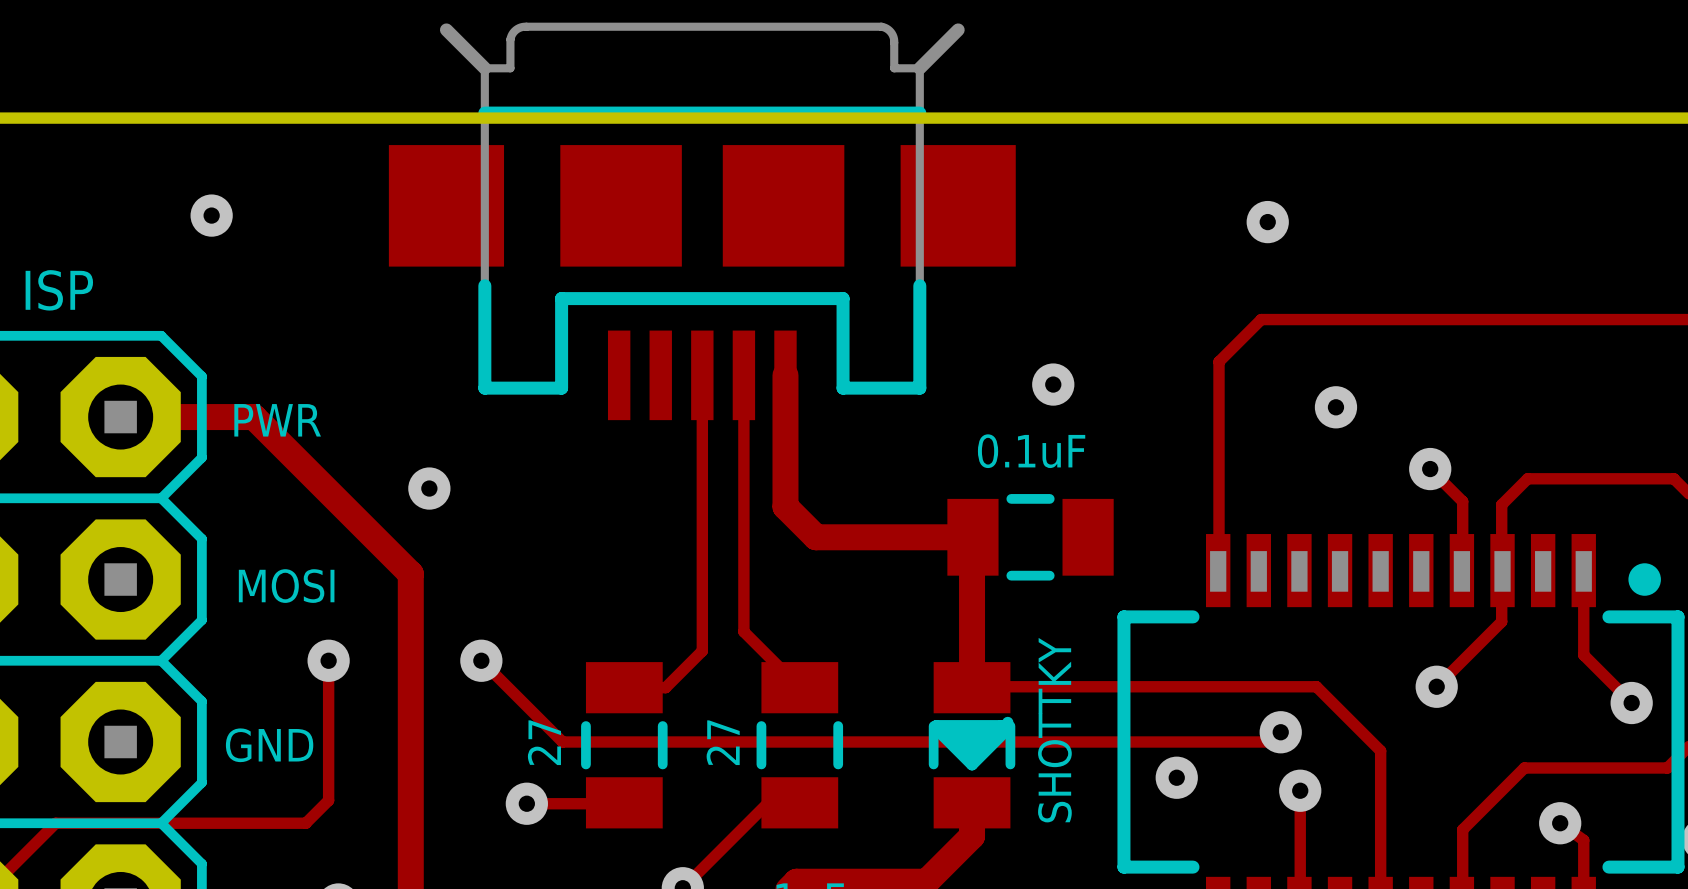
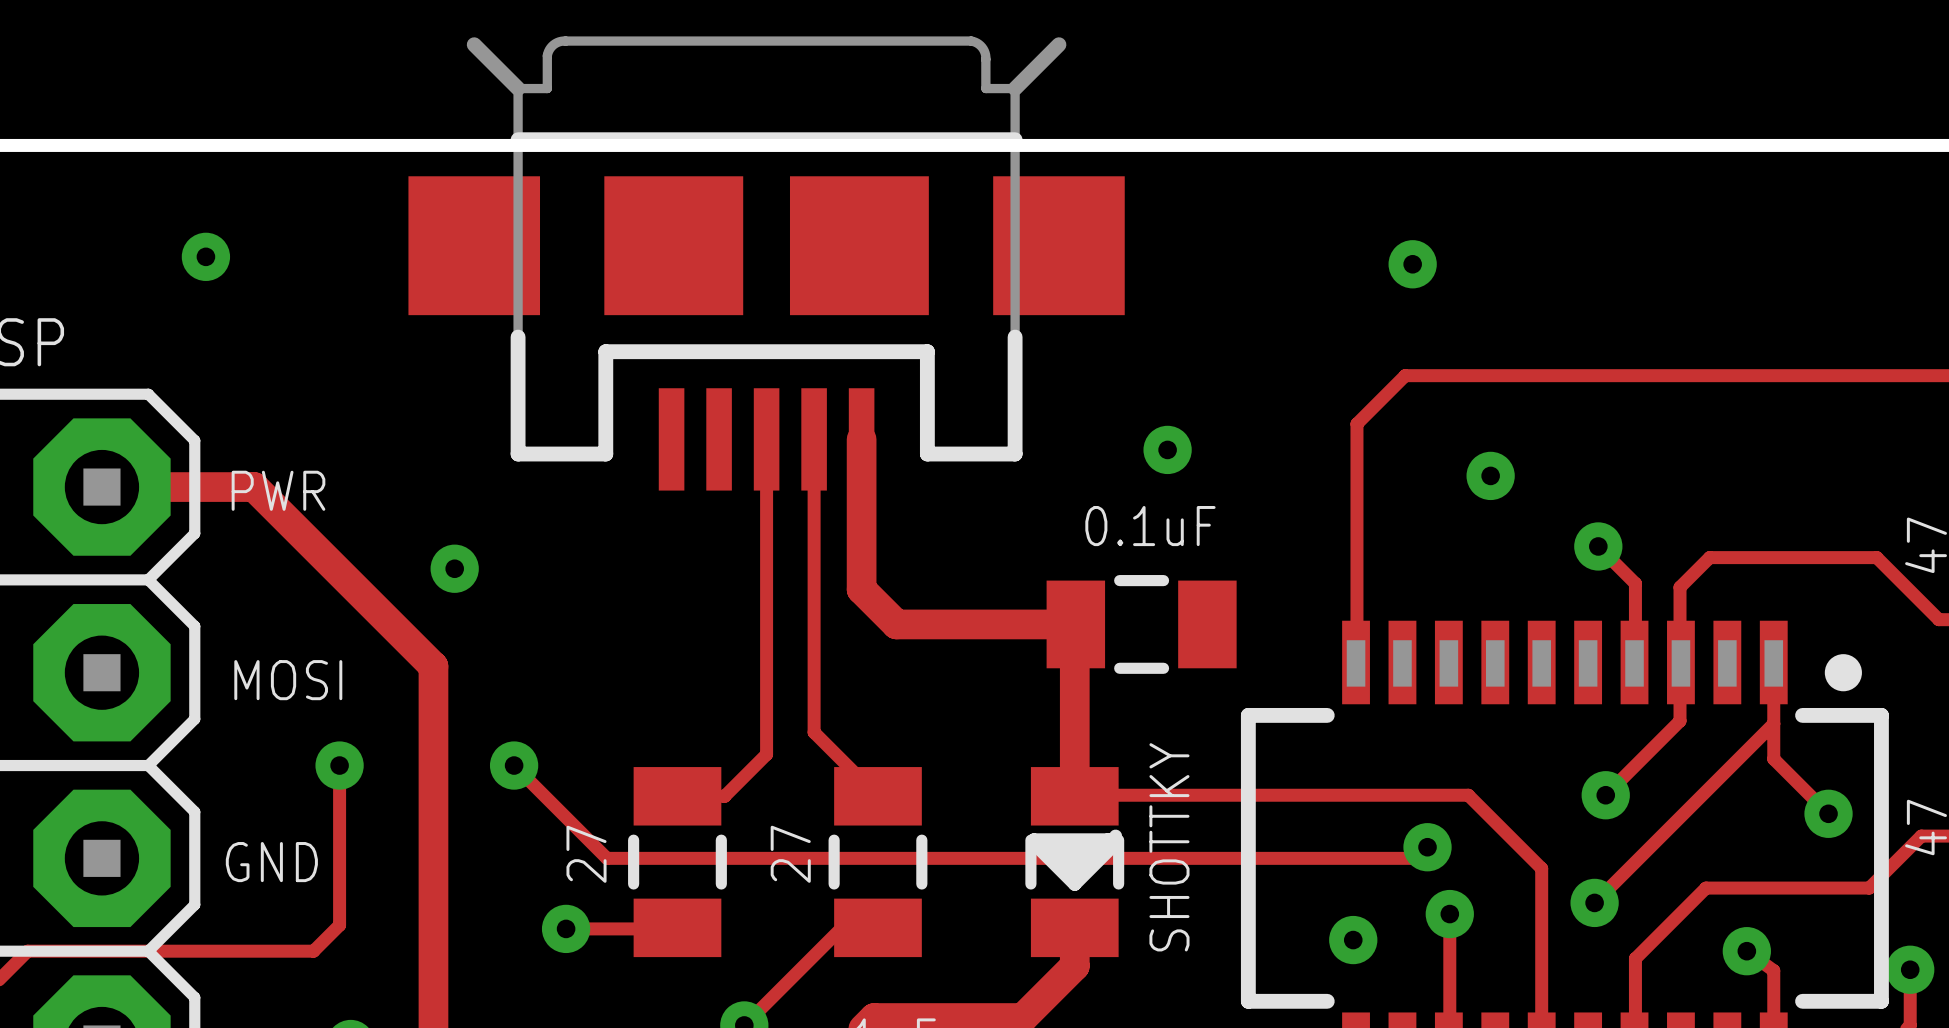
track: none -> (1773, 723) (1594, 902)
via position: (1176, 777) -> (1353, 940)
via: none -> (1594, 902)

